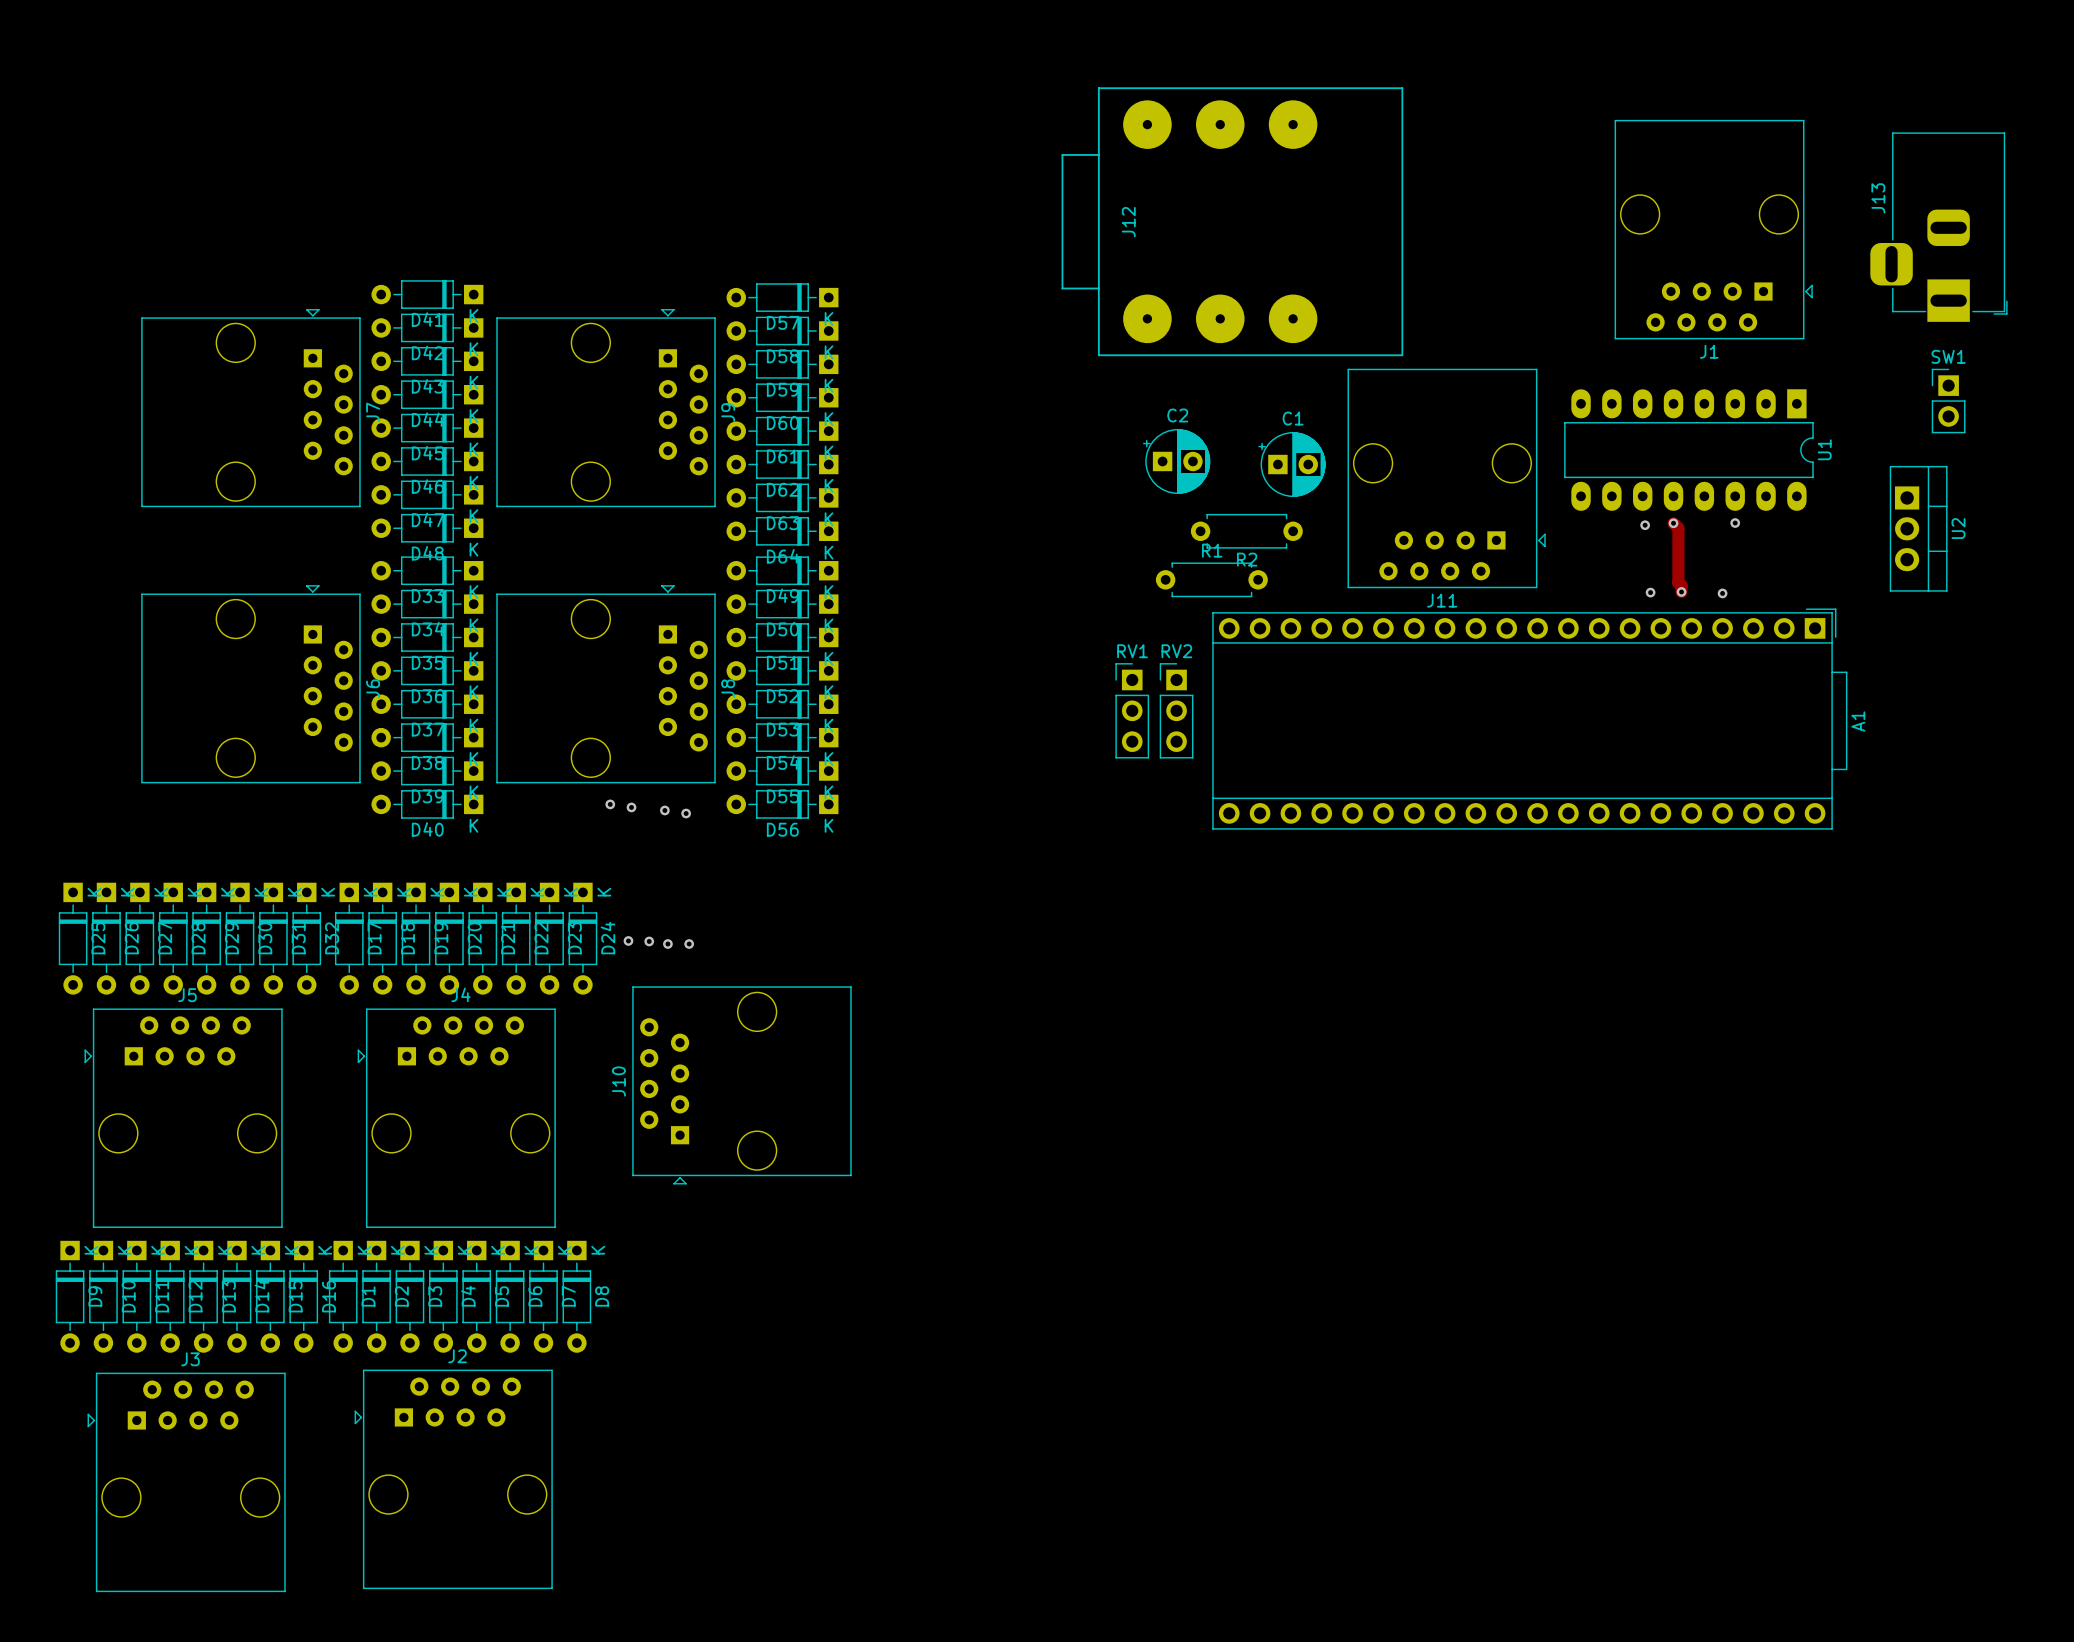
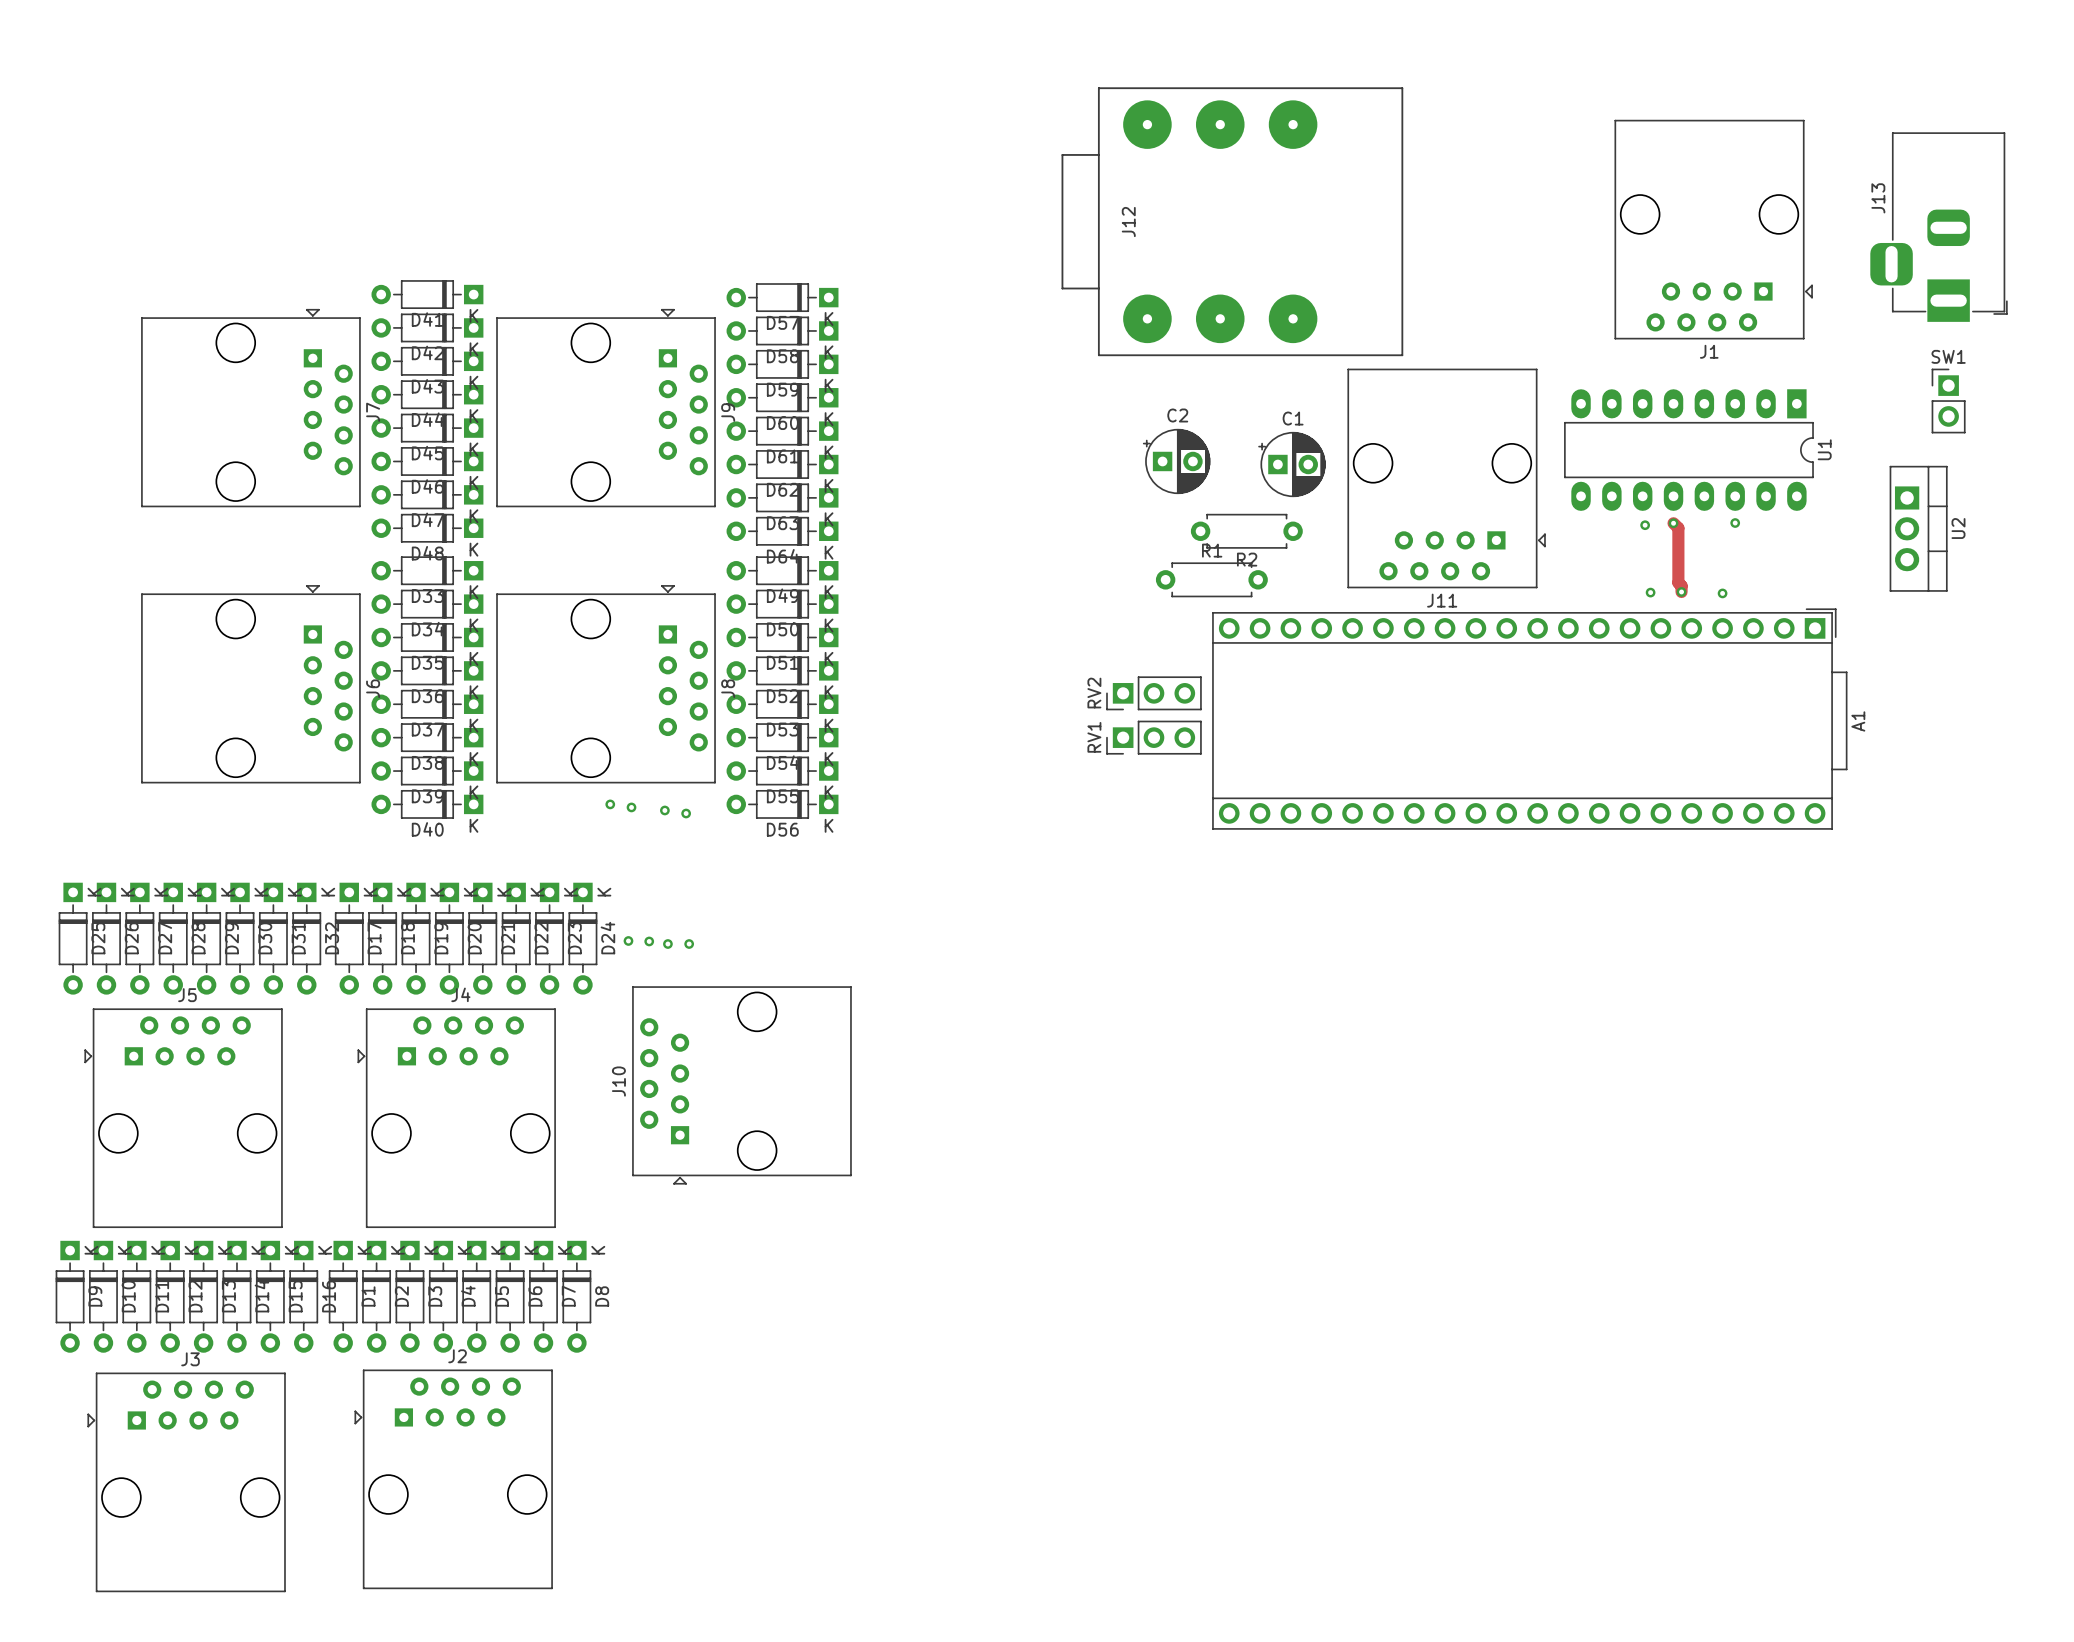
RV1 rotation: 0° (1132, 710) -> 90° counterclockwise (1153, 737)
RV2 rotation: 0° (1176, 710) -> 90° counterclockwise (1153, 693)

